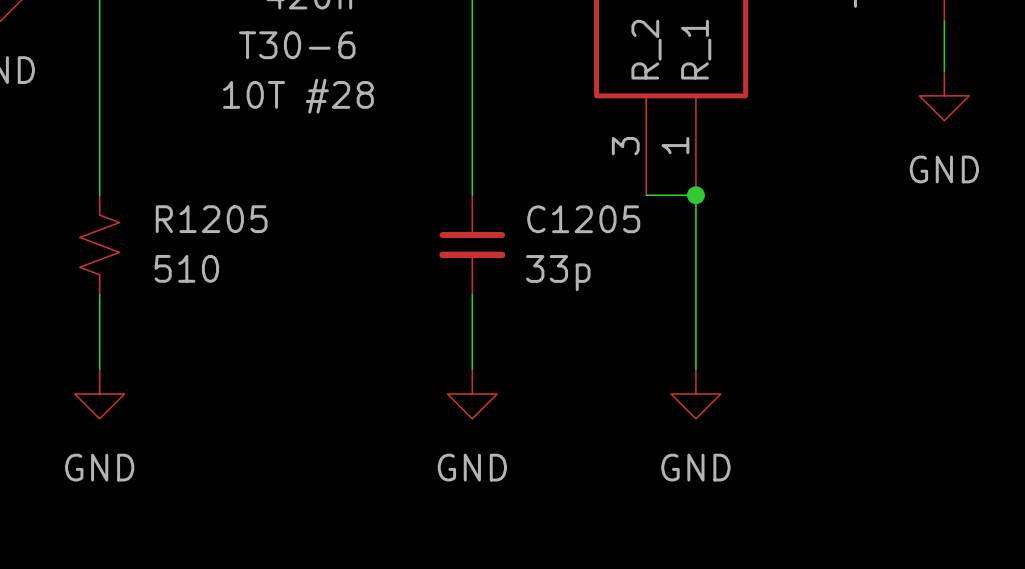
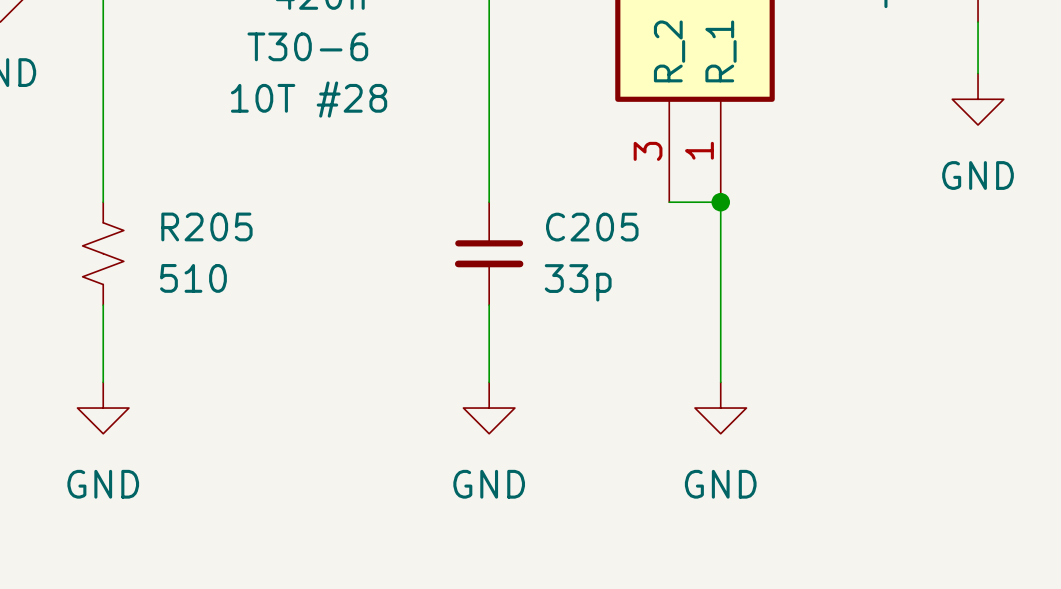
R1205 name: R1205 (211, 219) -> R205 (206, 226)
C1205 name: C1205 (583, 219) -> C205 (592, 227)

